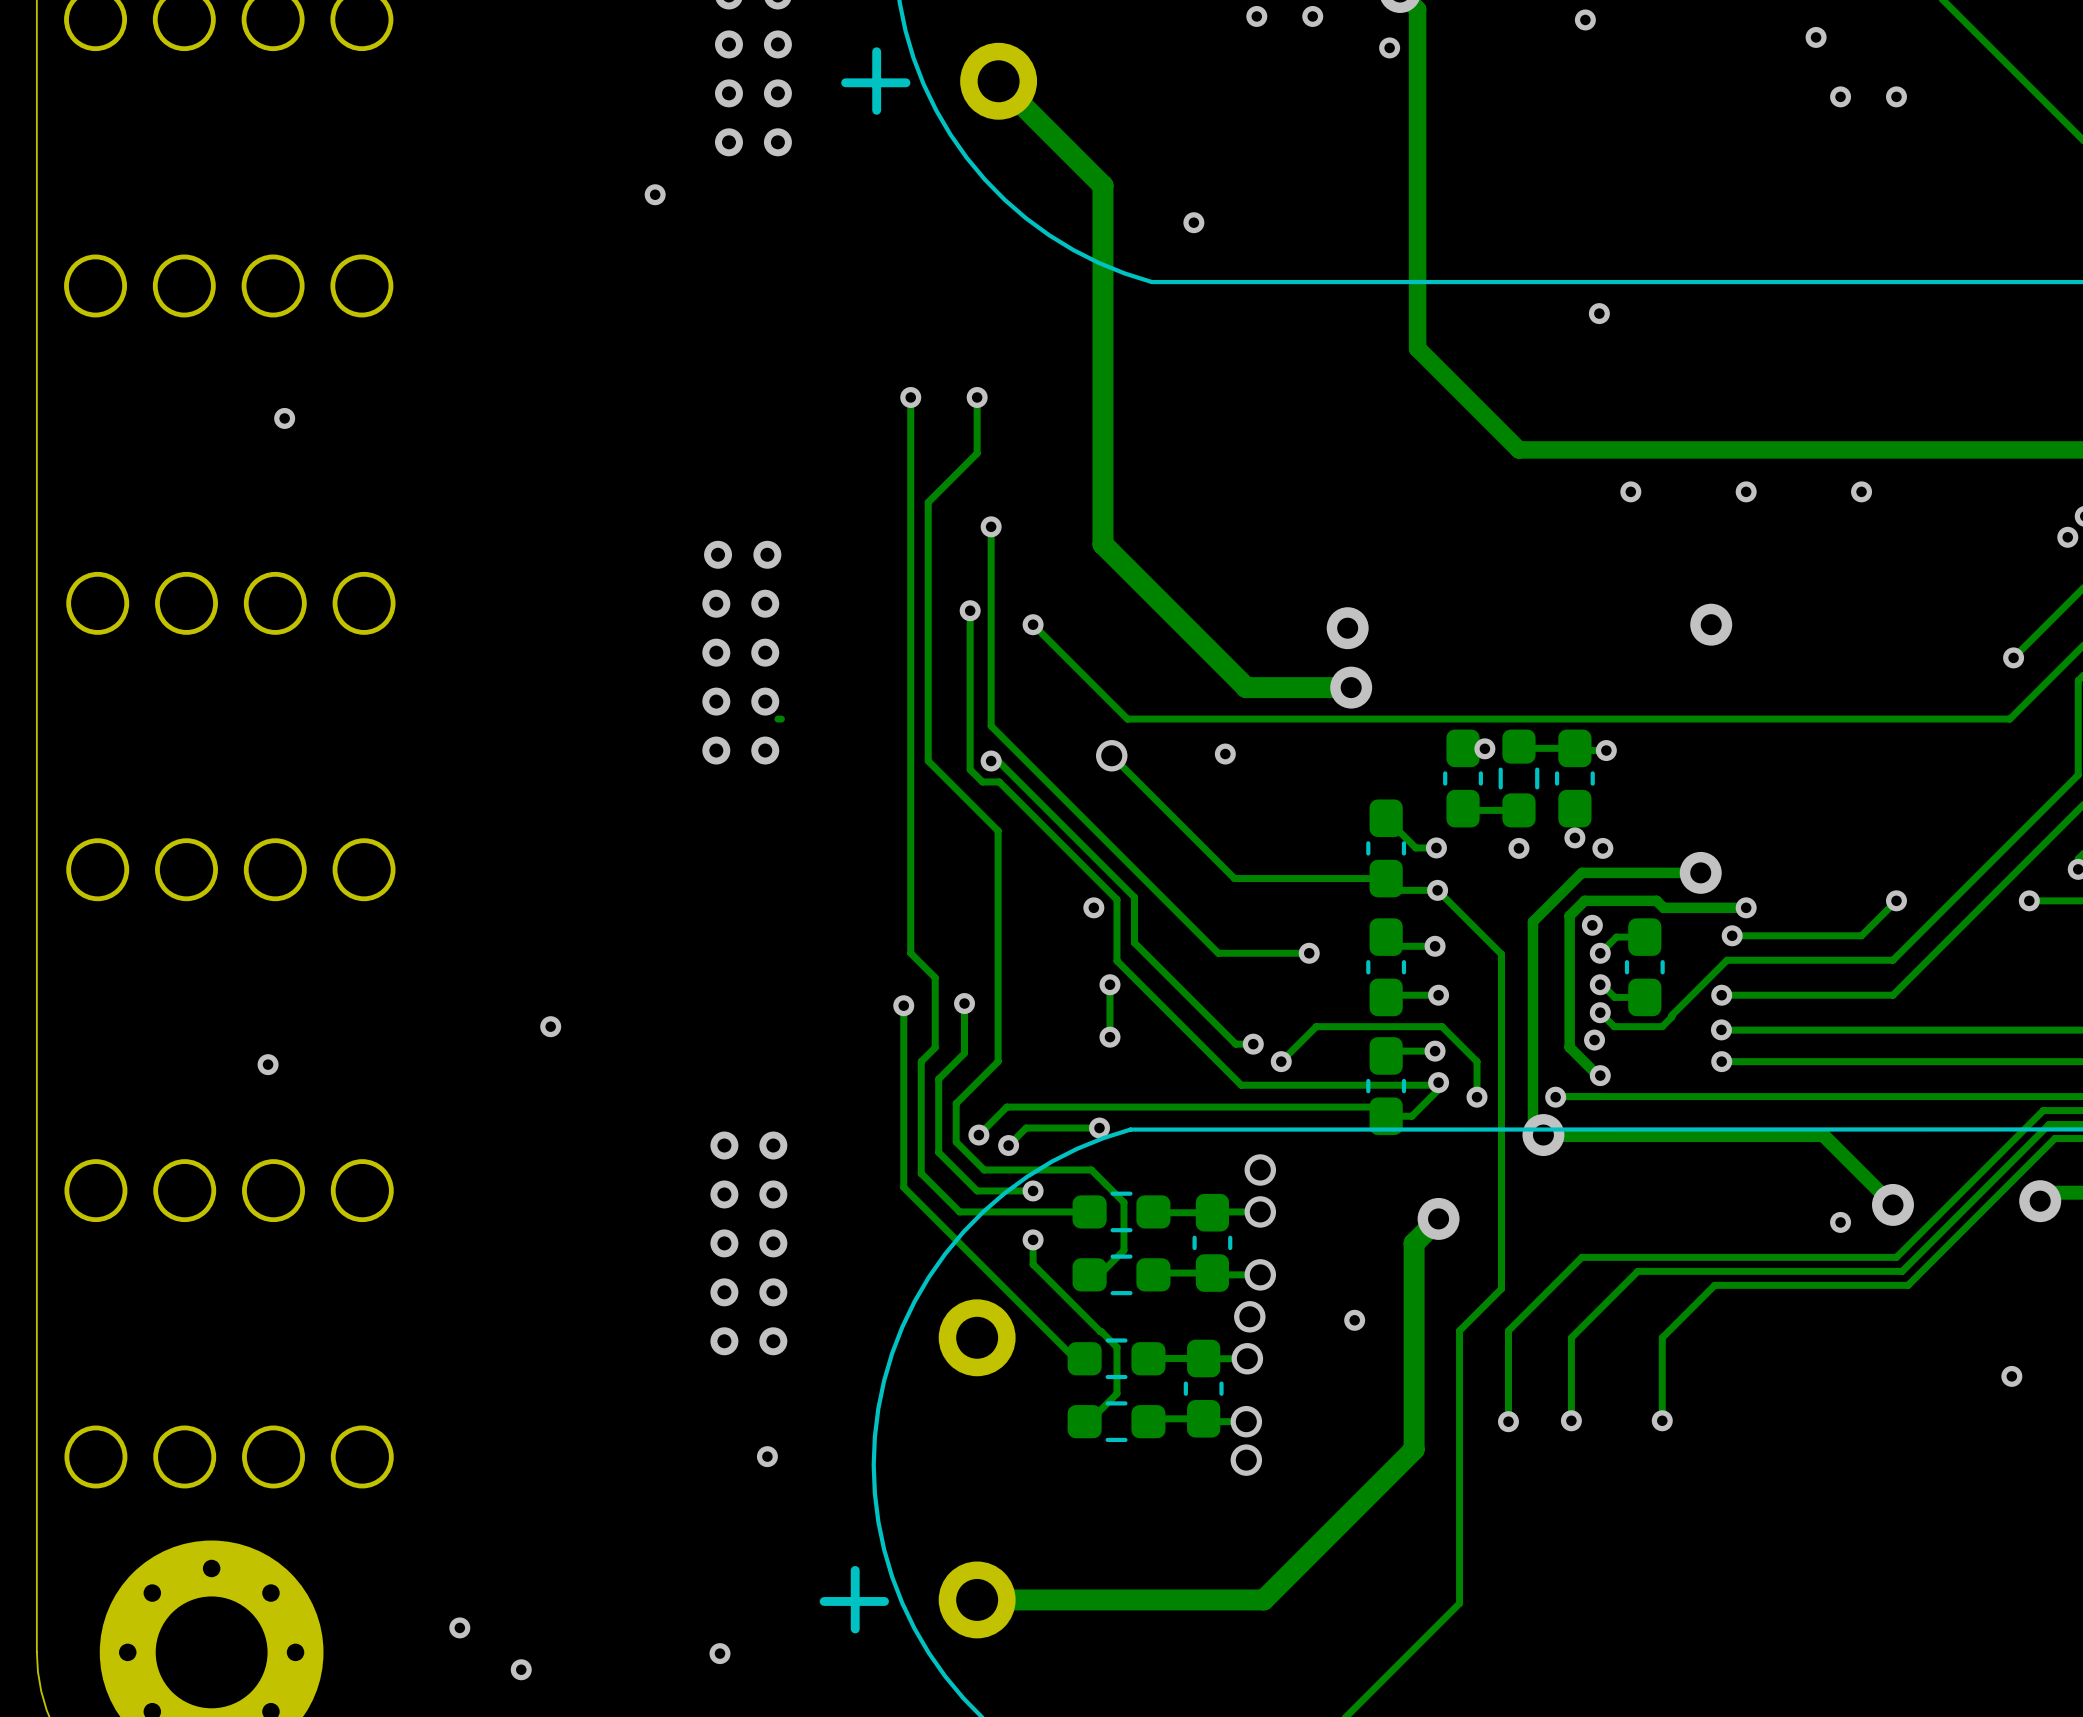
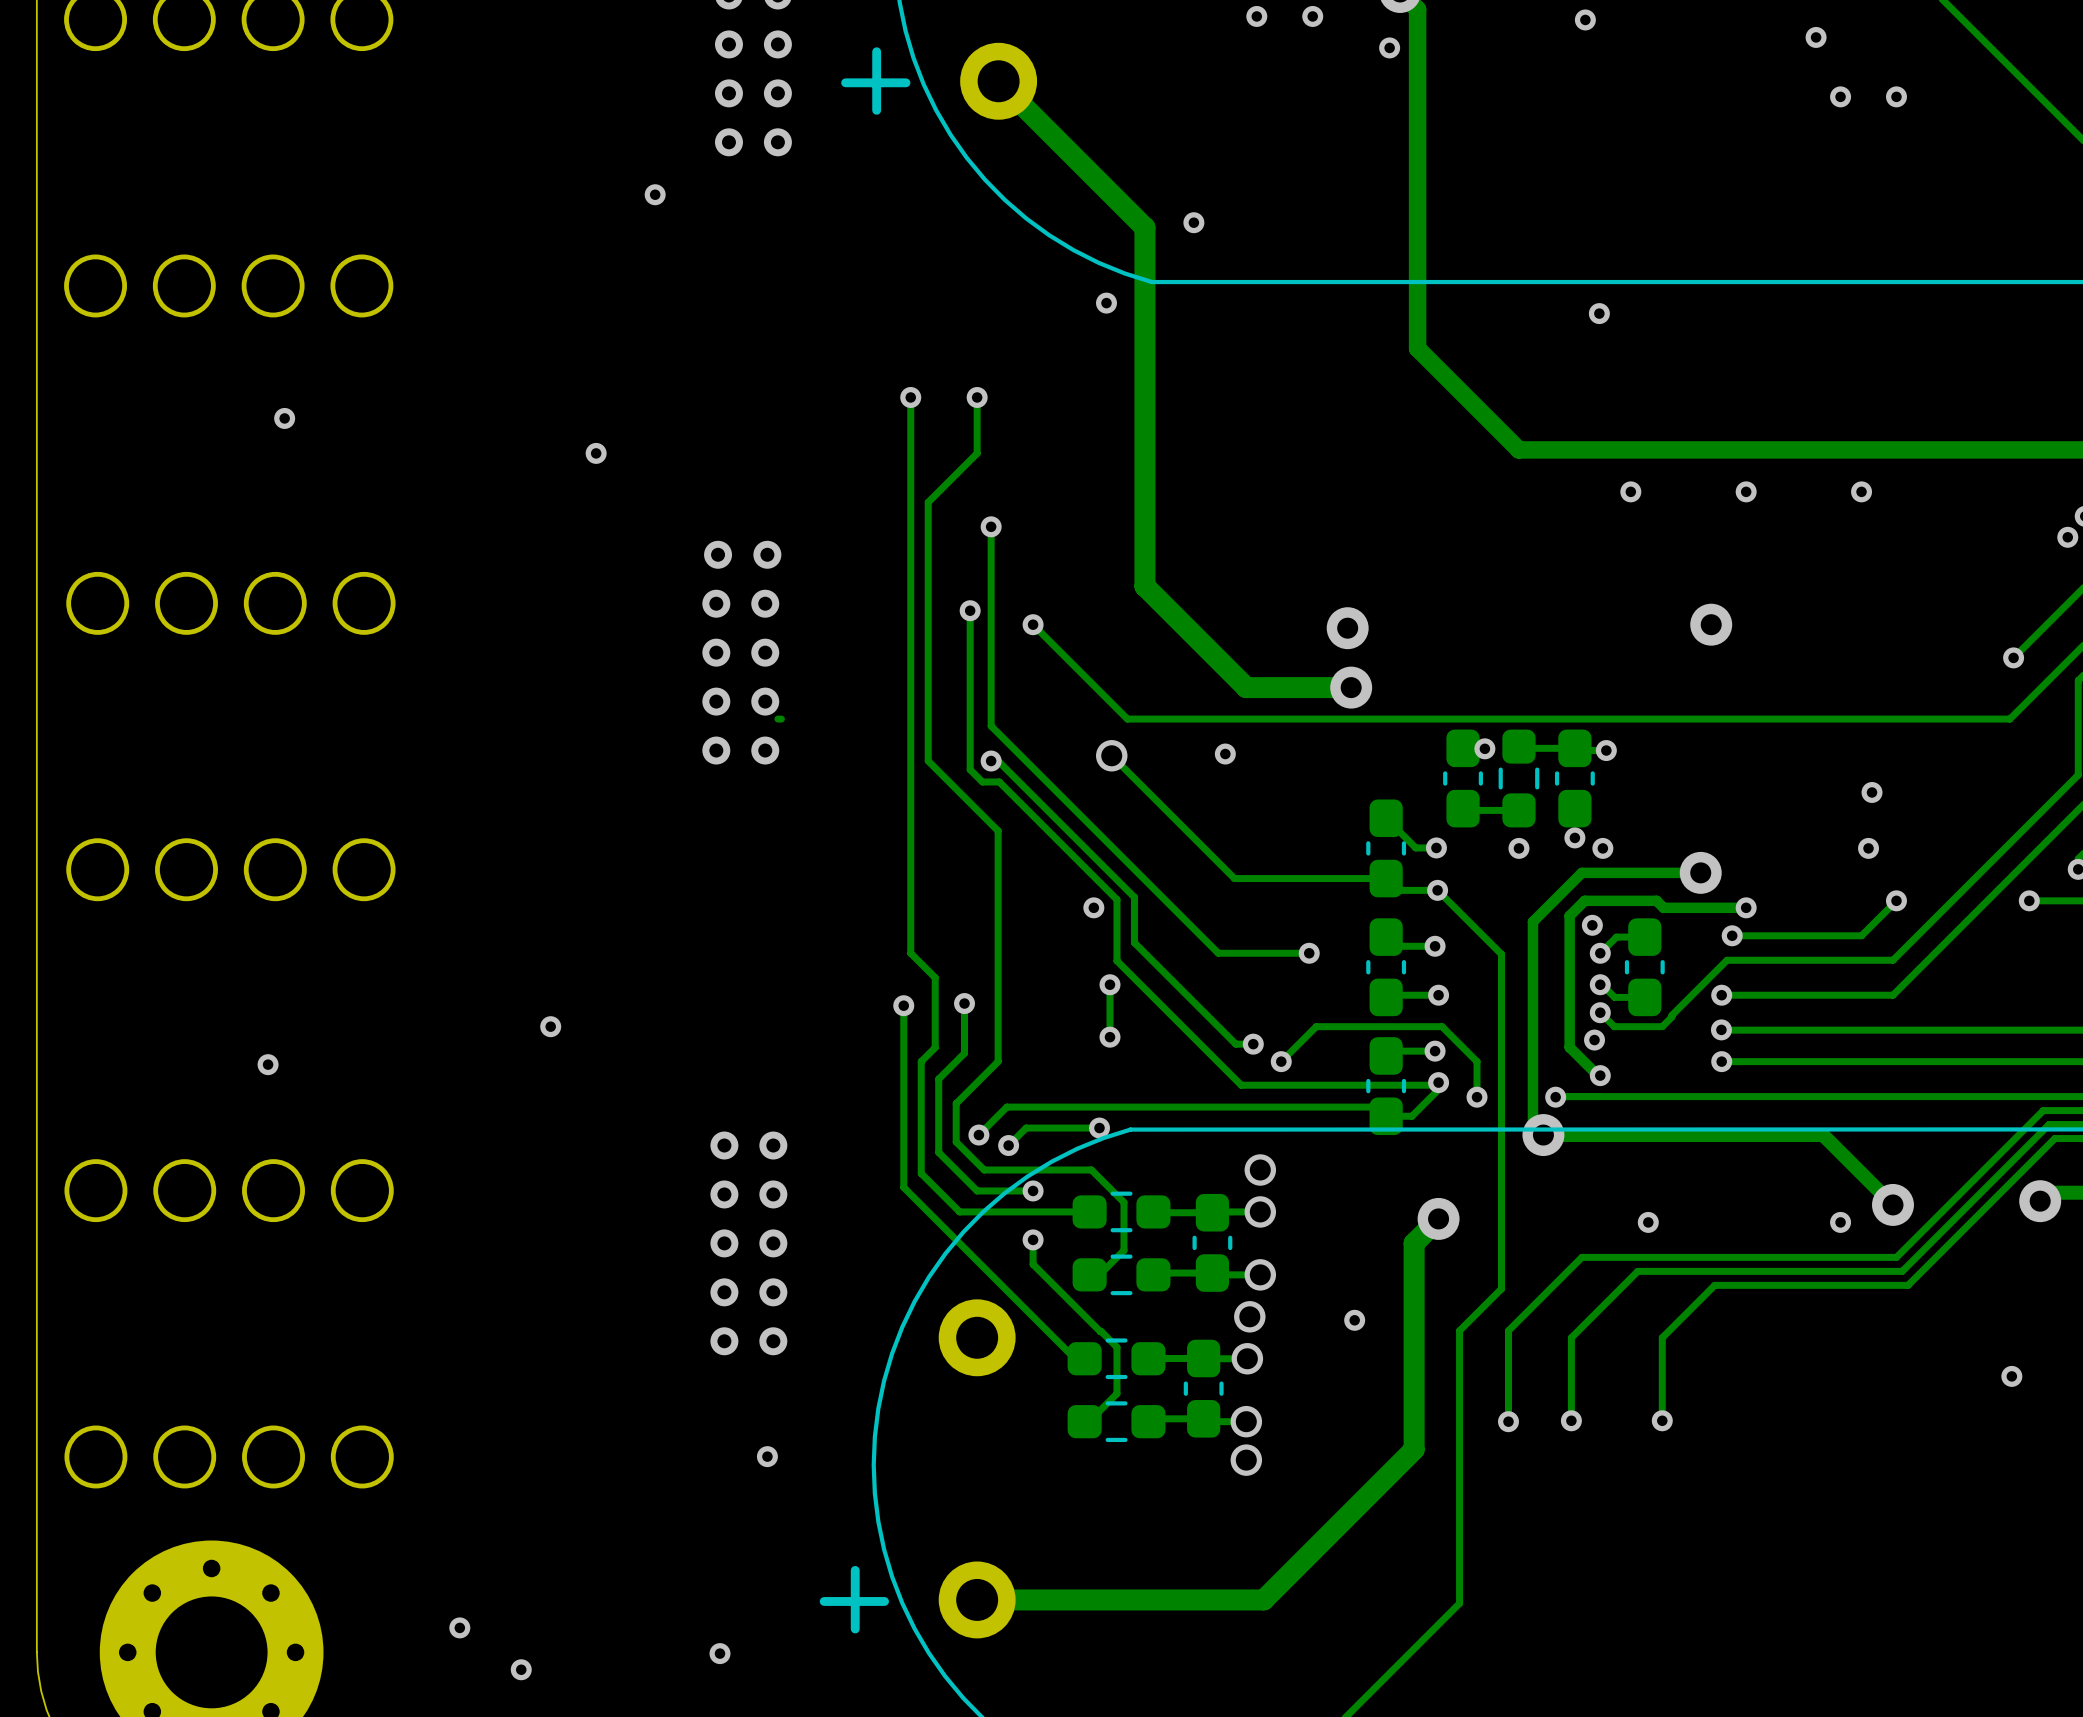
track: (1103, 185) (1103, 544) (1144, 586) -> (1103, 185) (1144, 227) (1144, 586)
via: none -> (1106, 303)
via: none -> (596, 453)
via: none -> (1872, 792)
via: none -> (1868, 848)
via: none -> (1648, 1222)

